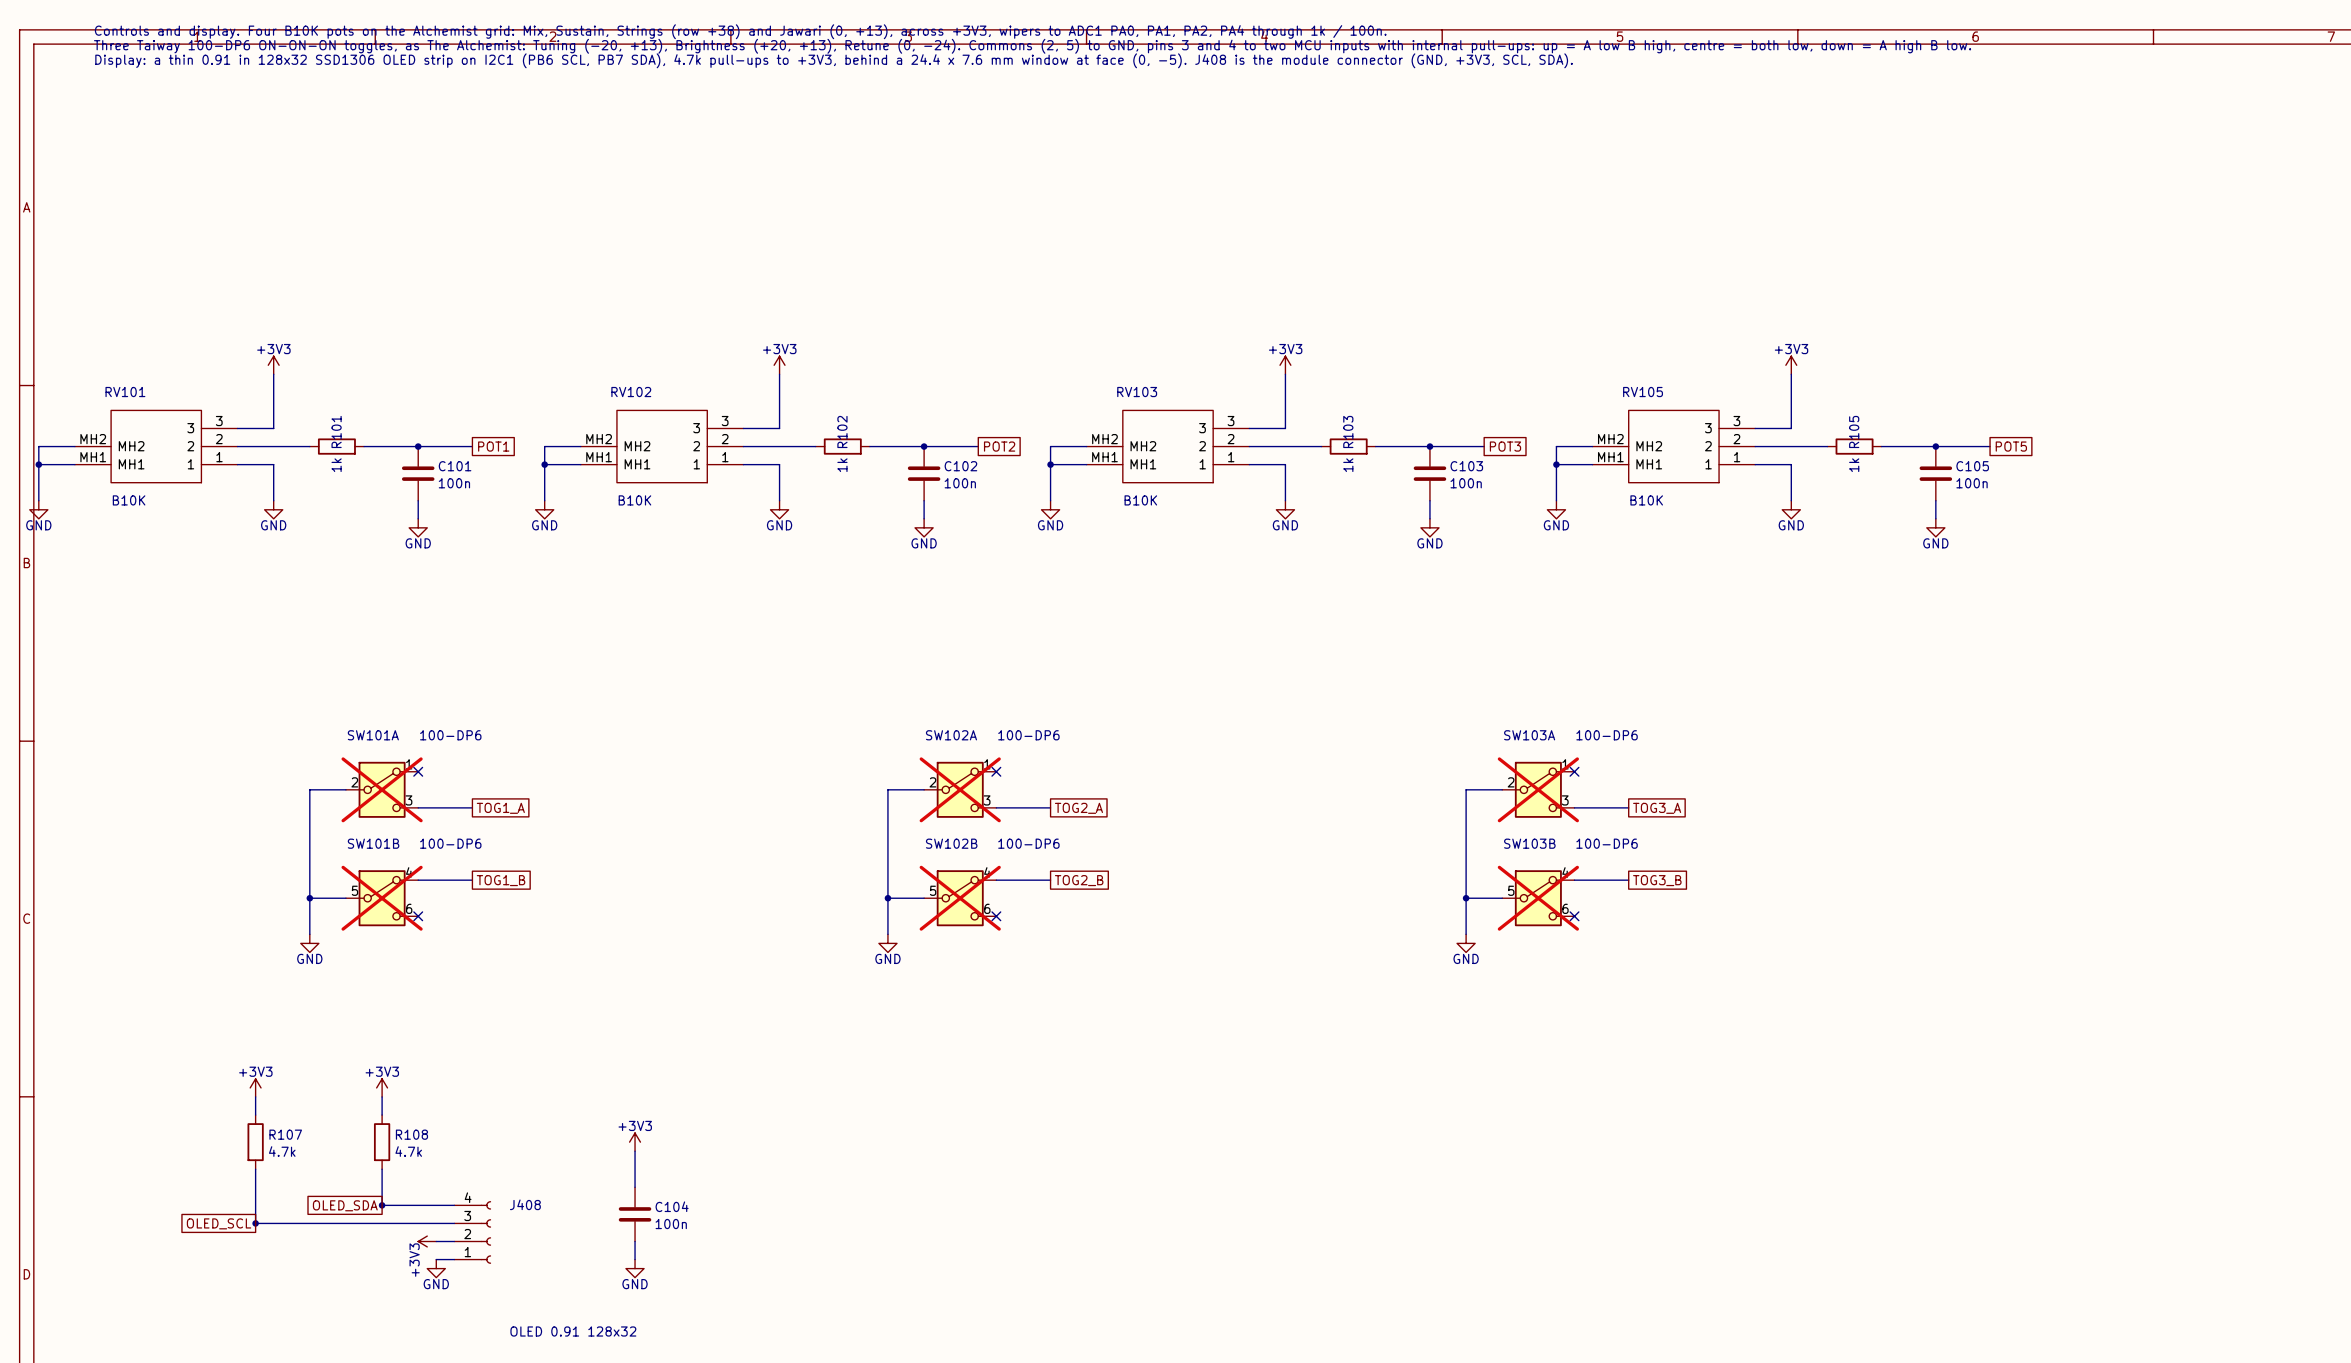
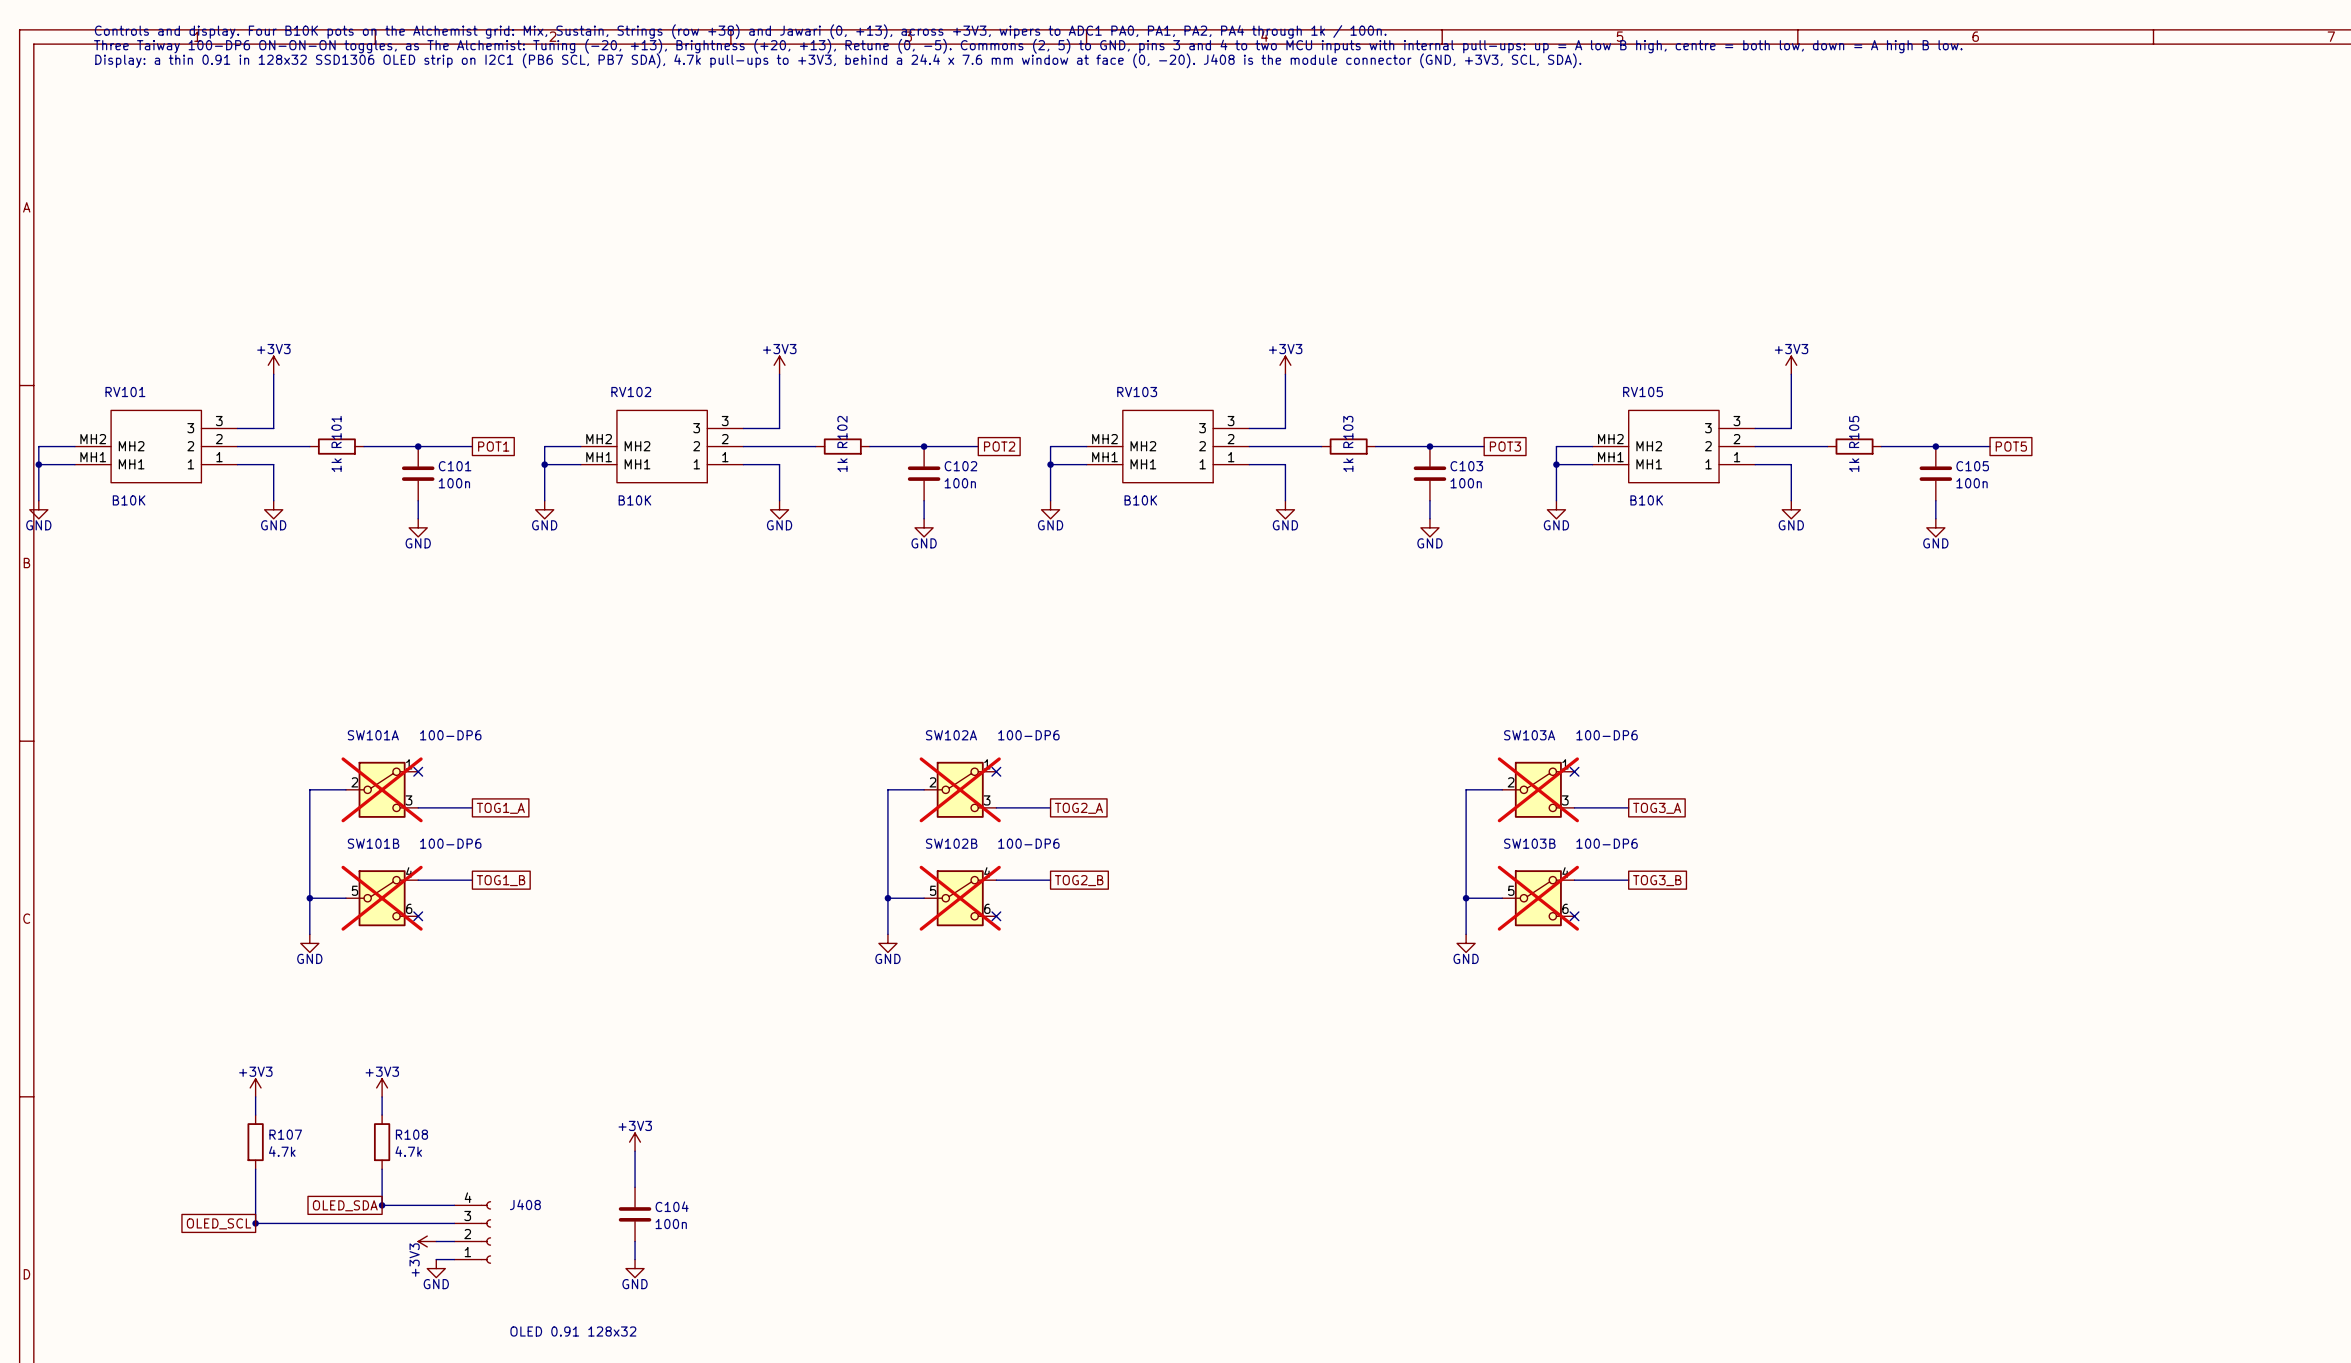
text: Three Taiway 100-DP6 ON-ON-ON toggles, as The Alchemist: Tuning (-20, +13), Brightness (+20, +13), Retune (0, -24). Commons (2, 5) to GND, pins 3 and 4 to two MCU inputs with internal pull-ups: up = A low B high, centre = both low, down = A high B low. (1032, 46) -> Three Taiway 100-DP6 ON-ON-ON toggles, as The Alchemist: Tuning (-20, +13), Brightness (+20, +13), Retune (0, -5). Commons (2, 5) to GND, pins 3 and 4 to two MCU inputs with internal pull-ups: up = A low B high, centre = both low, down = A high B low. (1028, 46)
text: Display: a thin 0.91 in 128x32 SSD1306 OLED strip on I2C1 (PB6 SCL, PB7 SDA), 4.7k pull-ups to +3V3, behind a 24.4 x 7.6 mm window at face (0, -5). J408 is the module connector (GND, +3V3, SCL, SDA). (834, 60) -> Display: a thin 0.91 in 128x32 SSD1306 OLED strip on I2C1 (PB6 SCL, PB7 SDA), 4.7k pull-ups to +3V3, behind a 24.4 x 7.6 mm window at face (0, -20). J408 is the module connector (GND, +3V3, SCL, SDA). (838, 60)

